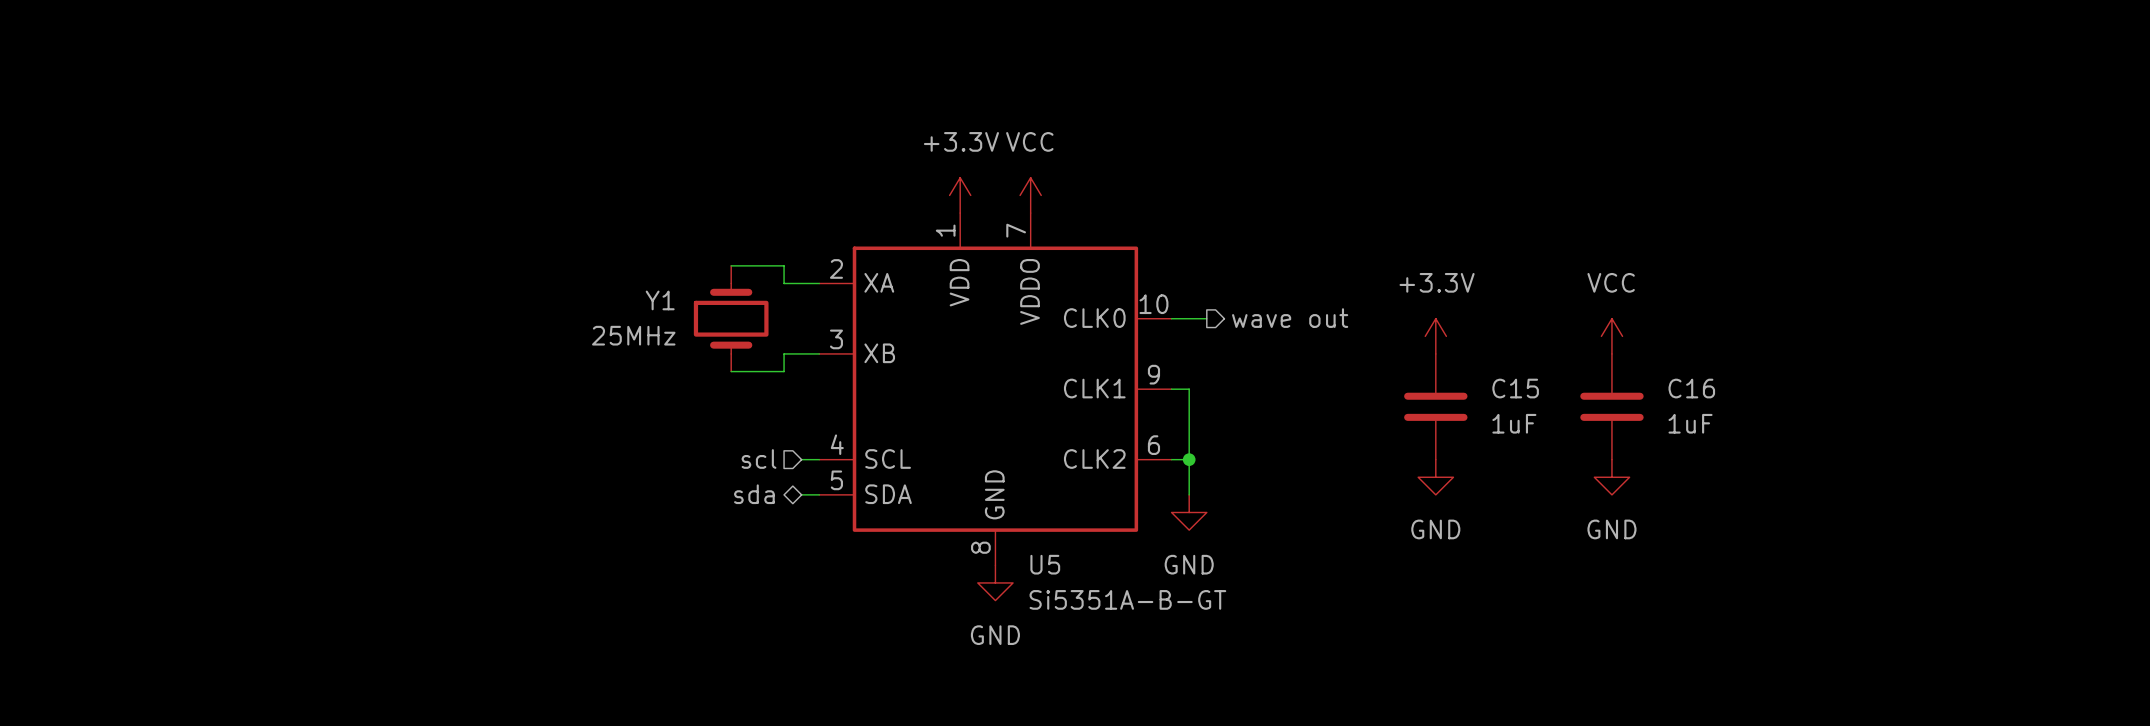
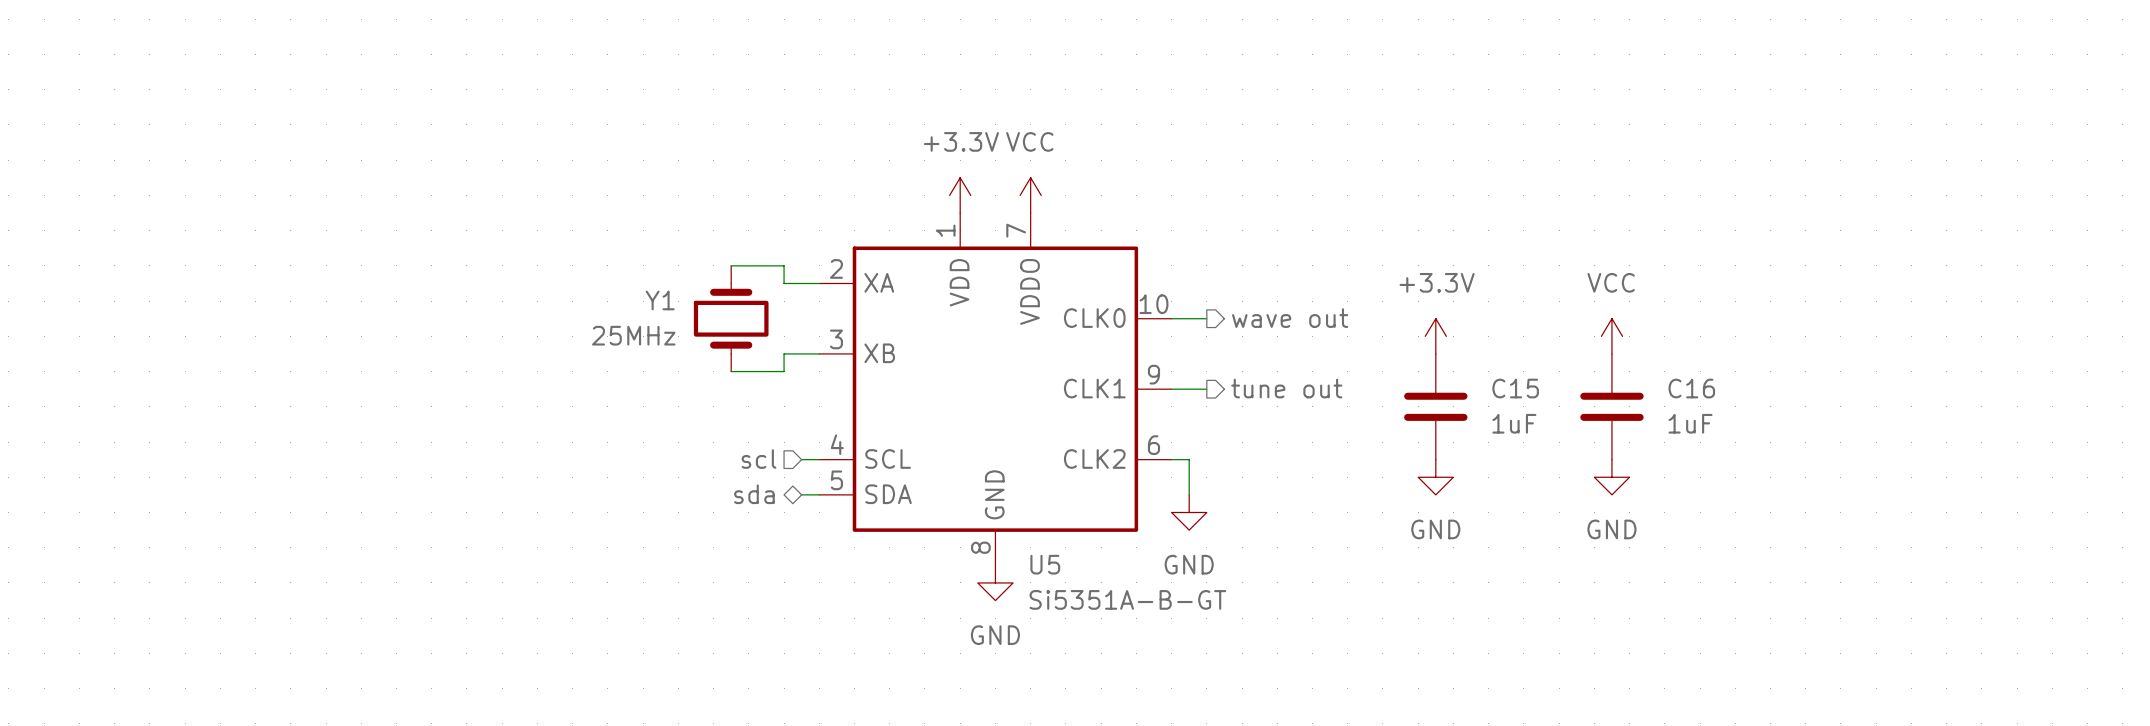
hierarchical label: none -> tune out (1286, 388)
wire: (1189, 389) (1189, 459) -> (1189, 389) (1206, 389)
junction: (1189, 459) -> none

